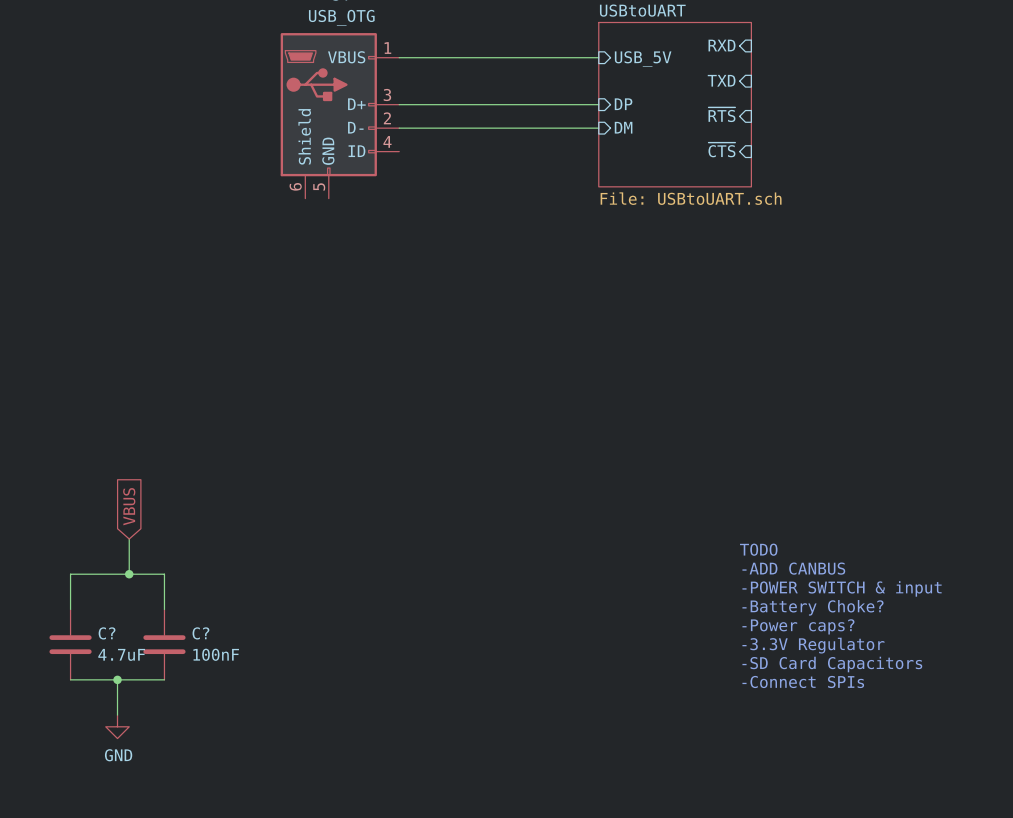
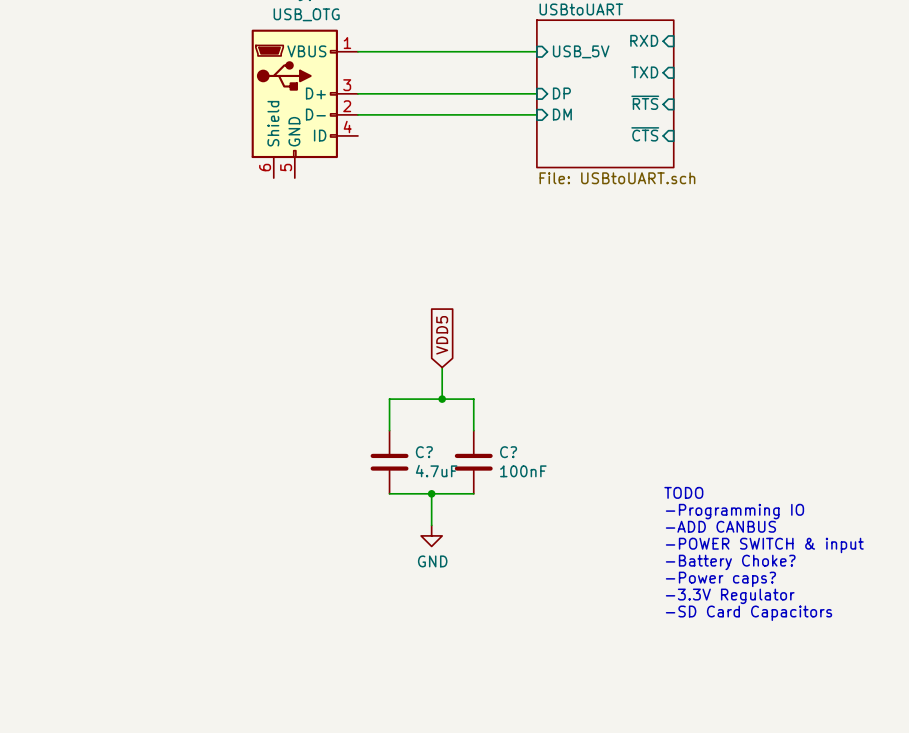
global label: none -> VDD5 (442, 335)
wire: none -> (442, 367) (442, 399)
junction: none -> (442, 399)
wire: none -> (389, 430) (389, 399) (473, 399) (473, 430)
global label: VBUS (129, 506) -> none
C?: none -> 4.7uF (389, 462)
C?: none -> 100nF (473, 462)
wire: (129, 538) (129, 574) -> none
wire: none -> (389, 493) (473, 493)
wire: none -> (431, 493) (431, 525)
junction: none -> (431, 493)
text: -ADD CANBUS (793, 568) -> -Programming IO (734, 511)
junction: (129, 574) -> none
text: -POWER SWITCH & input (842, 588) -> -ADD CANBUS (720, 526)
power symbol: none -> GND (431, 535)
text: -Battery Choke? (812, 607) -> -POWER SWITCH & input (764, 545)
wire: (70, 609) (70, 574) (164, 574) (164, 609) -> none
text: -Power caps? (798, 626) -> -Battery Choke? (730, 562)
C?: 4.7uF (70, 644) -> none
C?: 100nF (164, 644) -> none
text: -3.3V Regulator (813, 645) -> -Power caps? (720, 579)
text: -SD Card Capacitors (832, 664) -> -3.3V Regulator (730, 596)
wire: (70, 679) (164, 679) -> none
wire: (117, 679) (117, 715) -> none
junction: (117, 679) -> none
text: -Connect SPIs (803, 681) -> -SD Card Capacitors (749, 613)
power symbol: GND (117, 726) -> none

